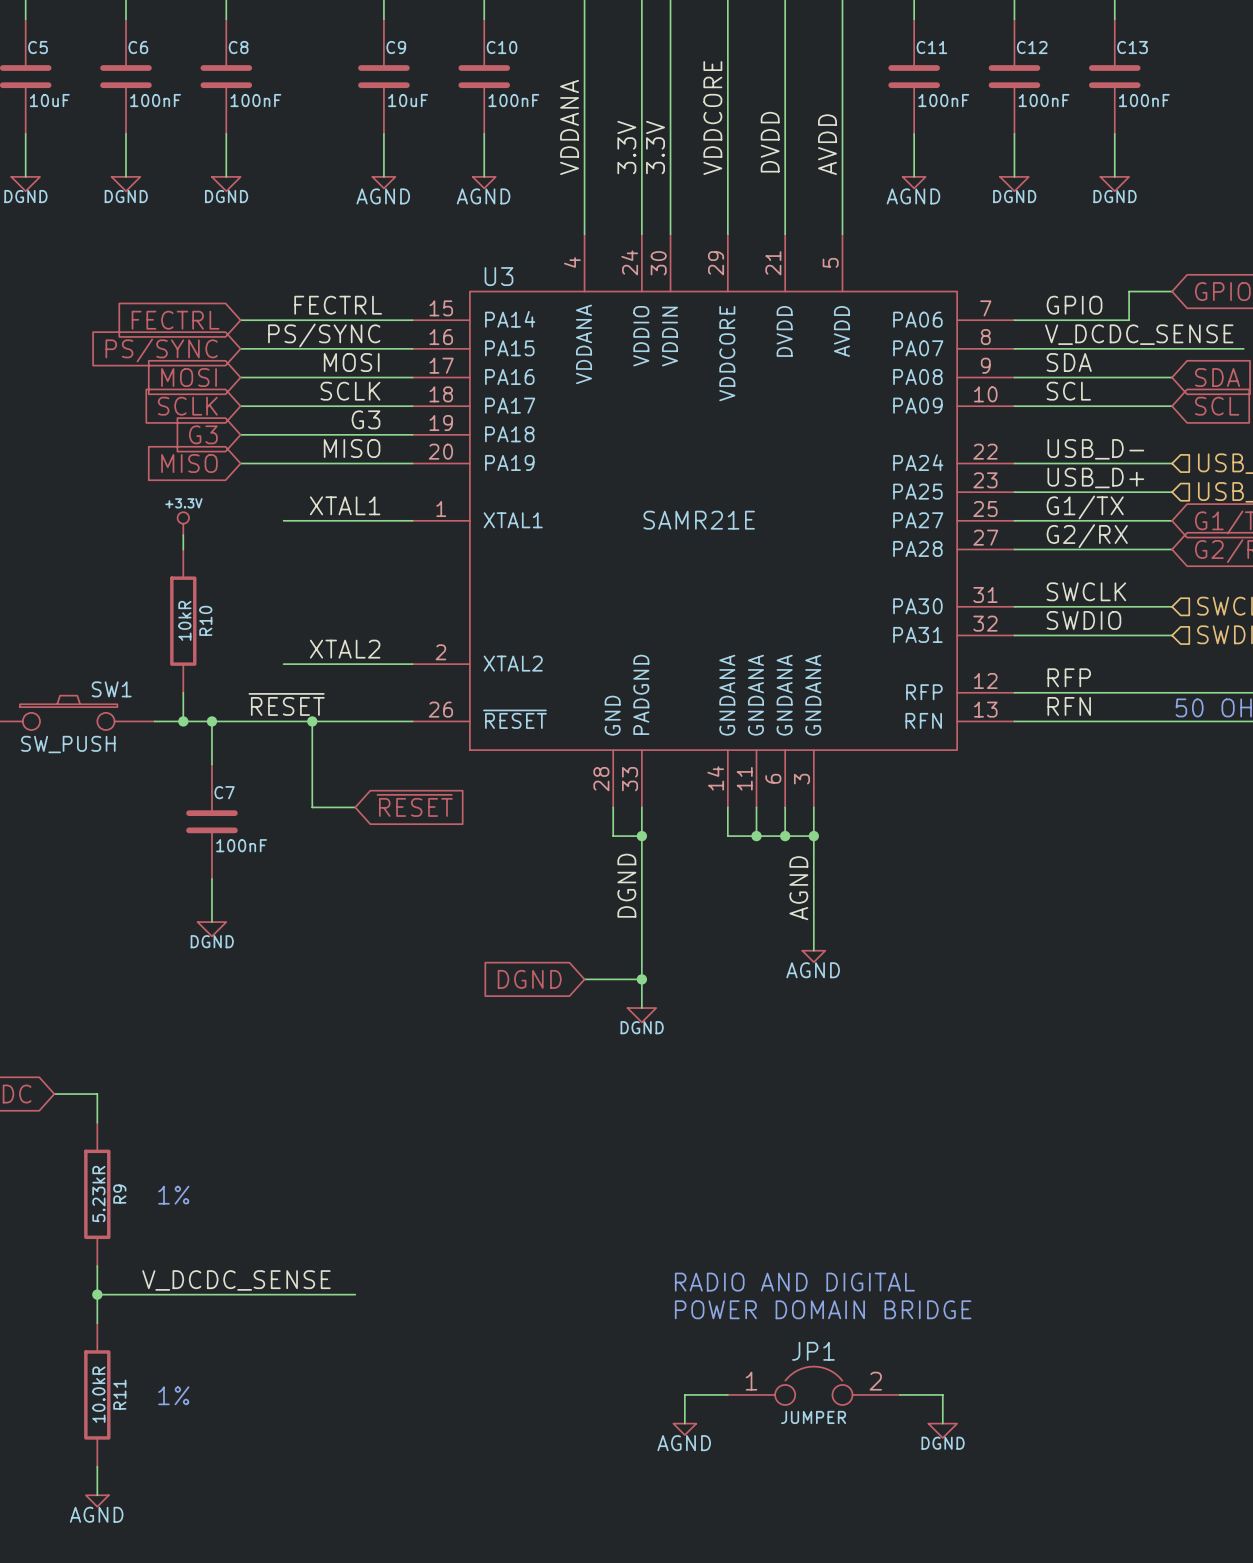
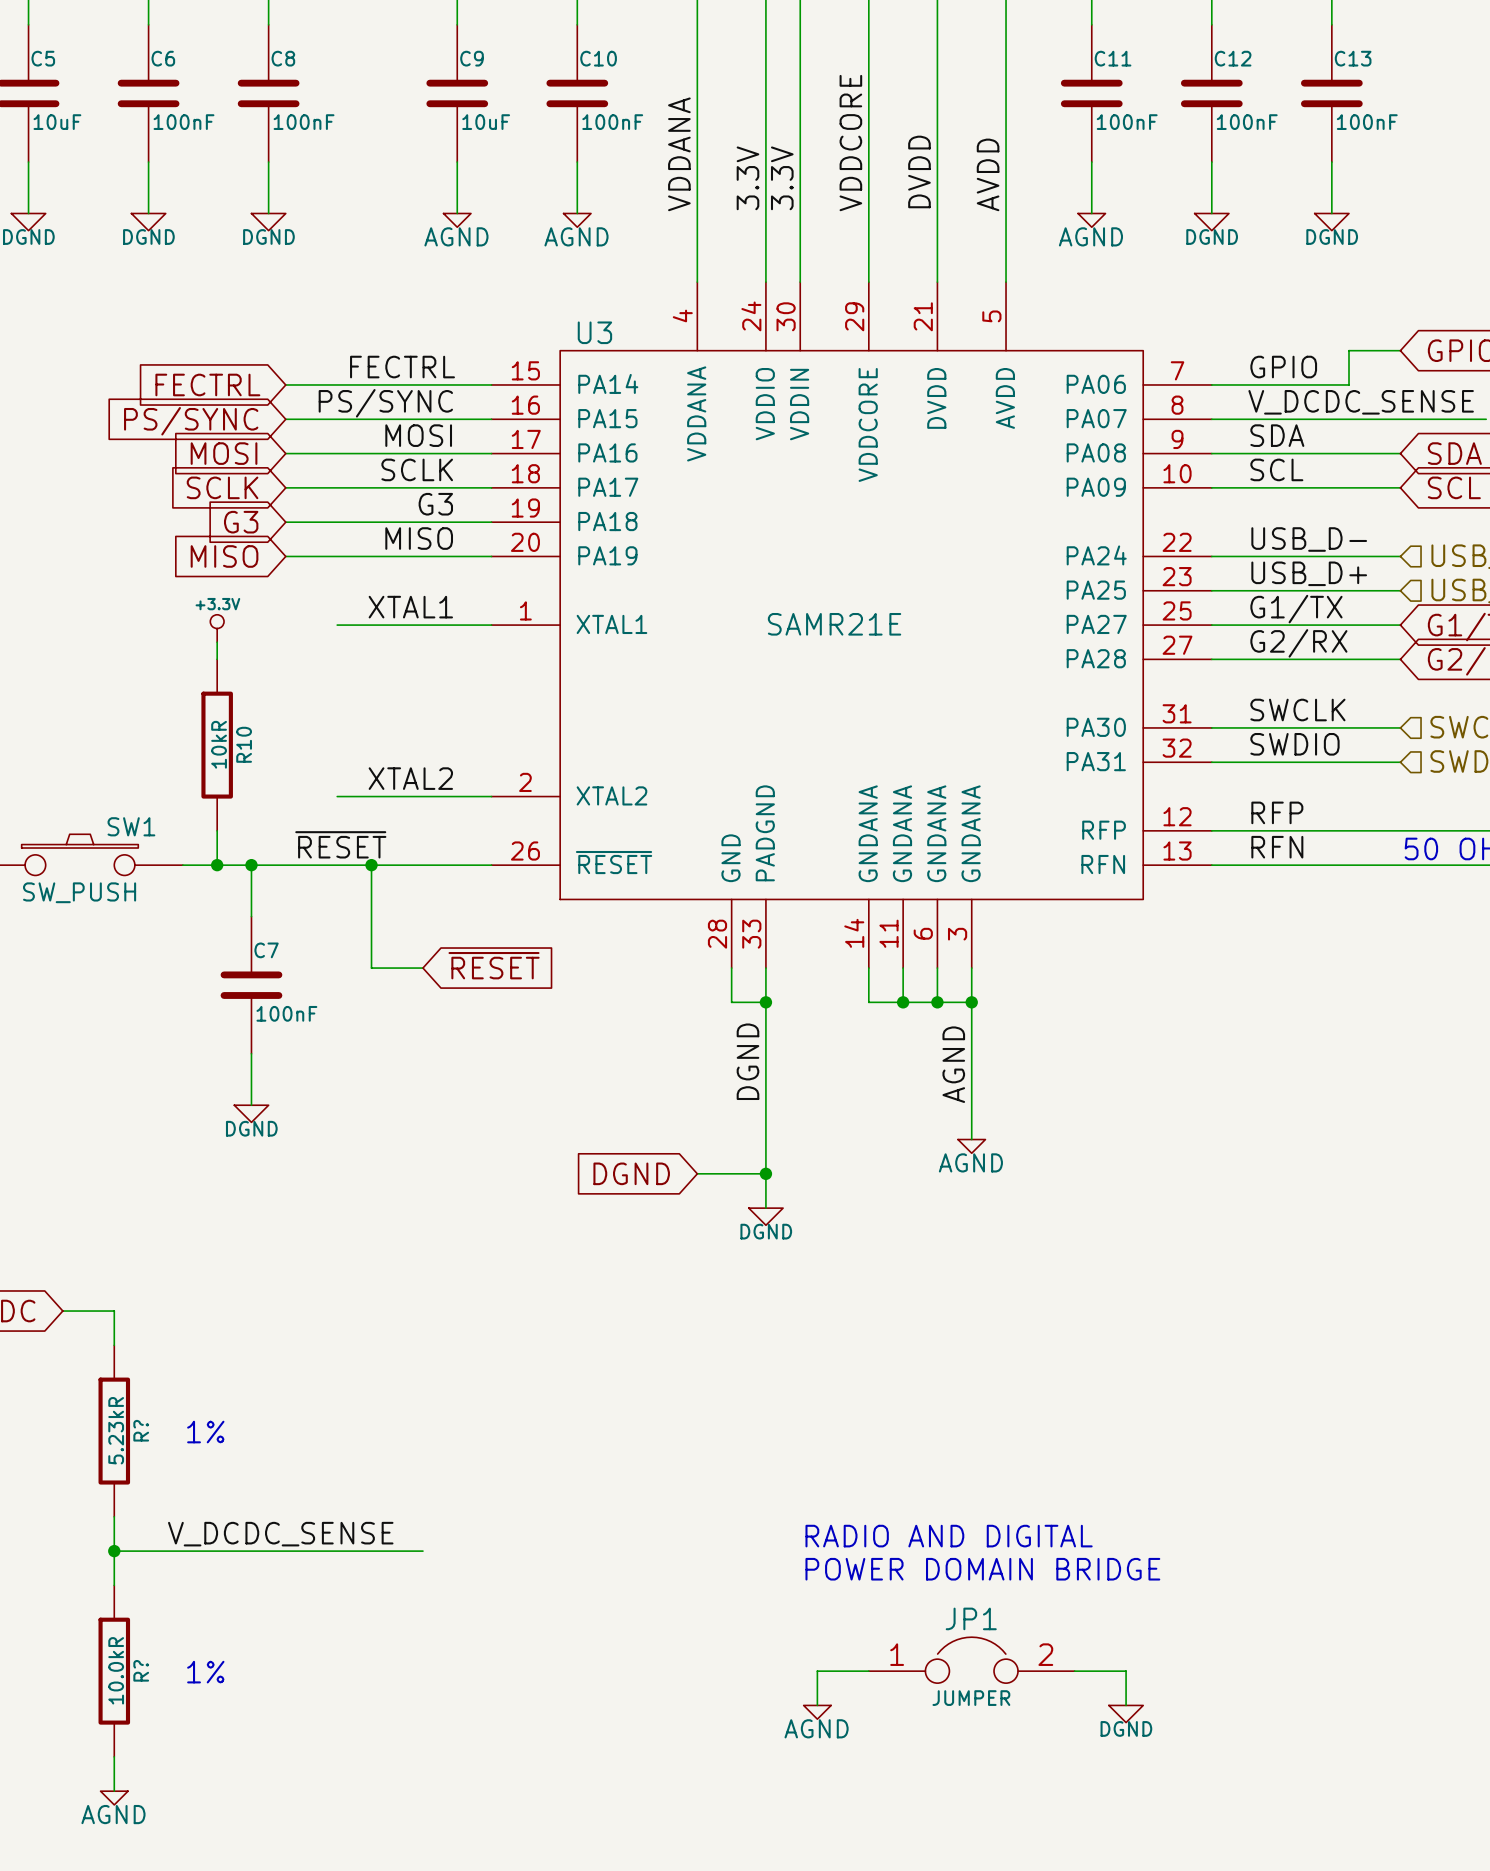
R9 name: R9 (119, 1194) -> R? (141, 1430)
R11 name: R11 (119, 1394) -> R? (141, 1670)

